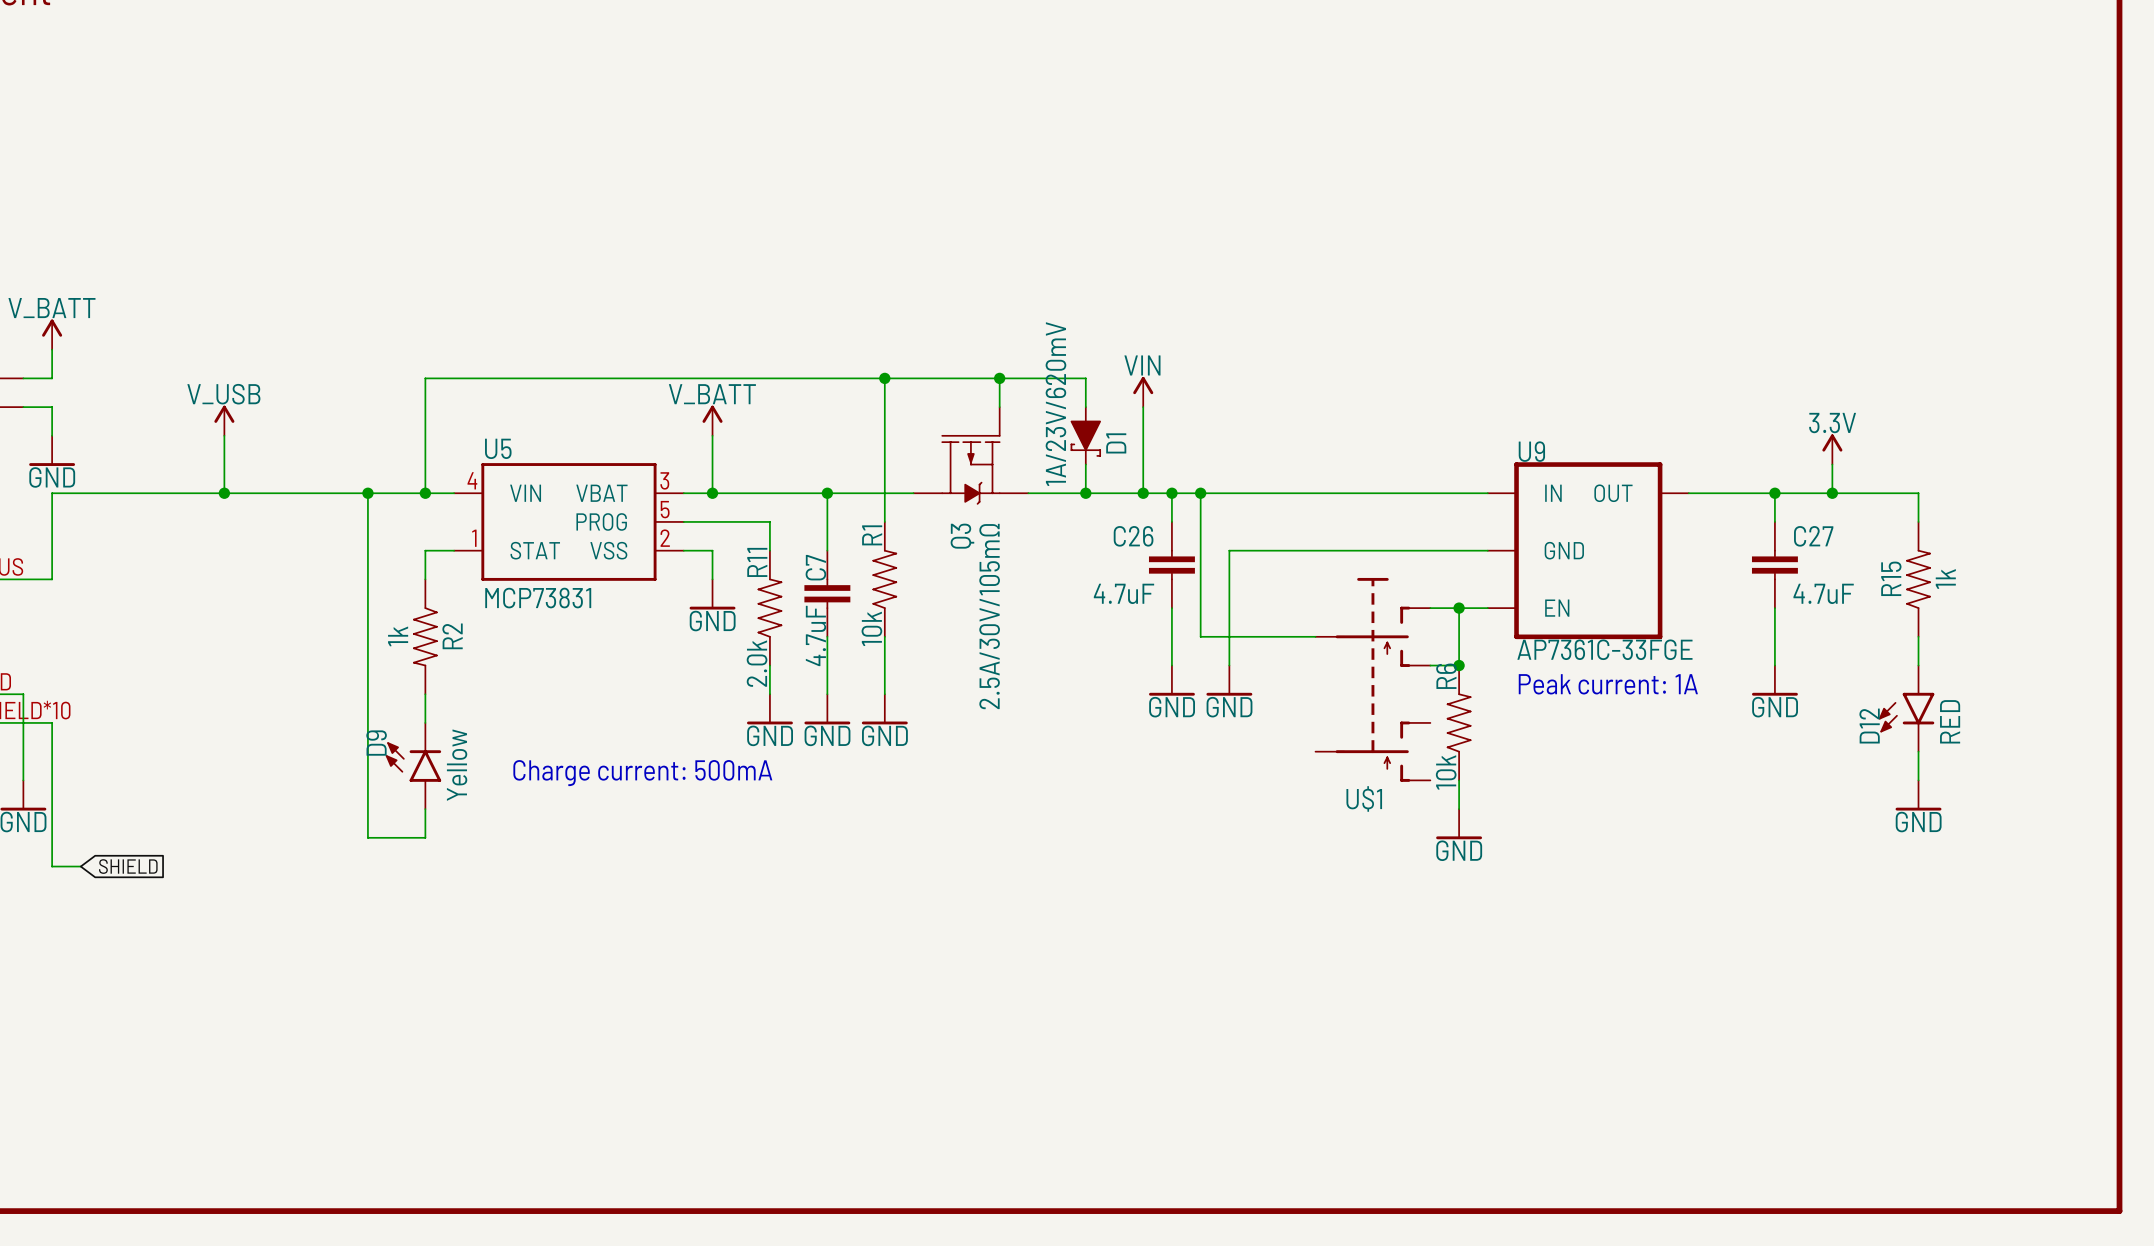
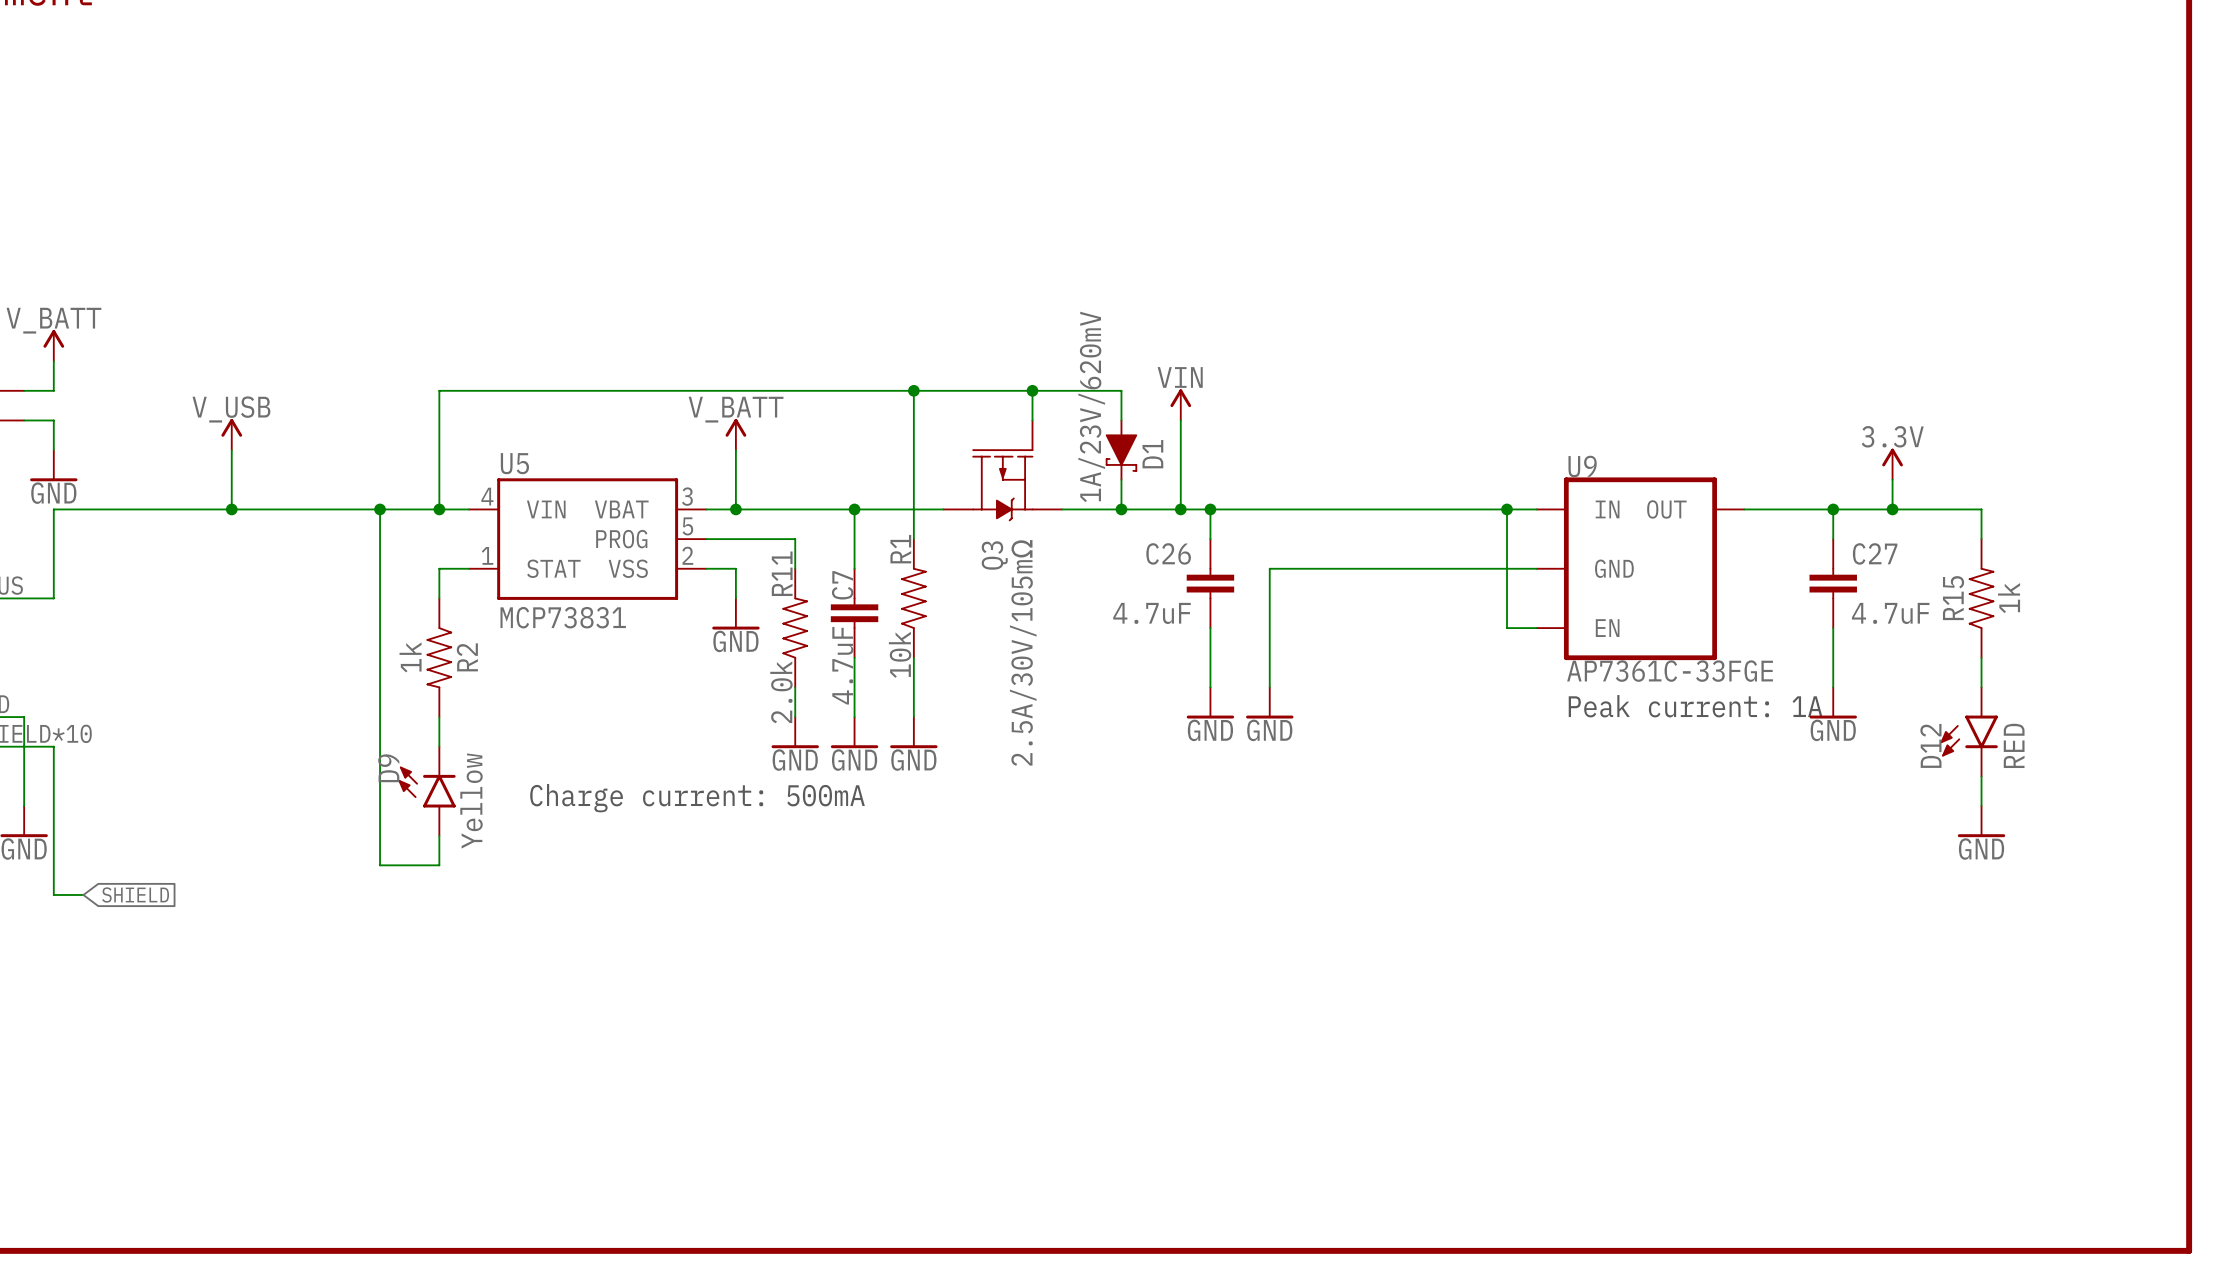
wire: (1200, 493) (1200, 636) (1315, 636) -> none
junction: (1200, 493) -> none
wire: none -> (1507, 509) (1507, 628)
junction: none -> (1507, 509)
wire: (1430, 608) (1459, 608) (1459, 665) (1430, 665) -> none
junction: (1459, 608) -> none
junction: (1459, 665) -> none
U$1: (1372, 679) -> none
R6: 10k (1459, 722) -> none
wire: (1459, 780) (1459, 809) -> none
power symbol: GND (1459, 824) -> none

